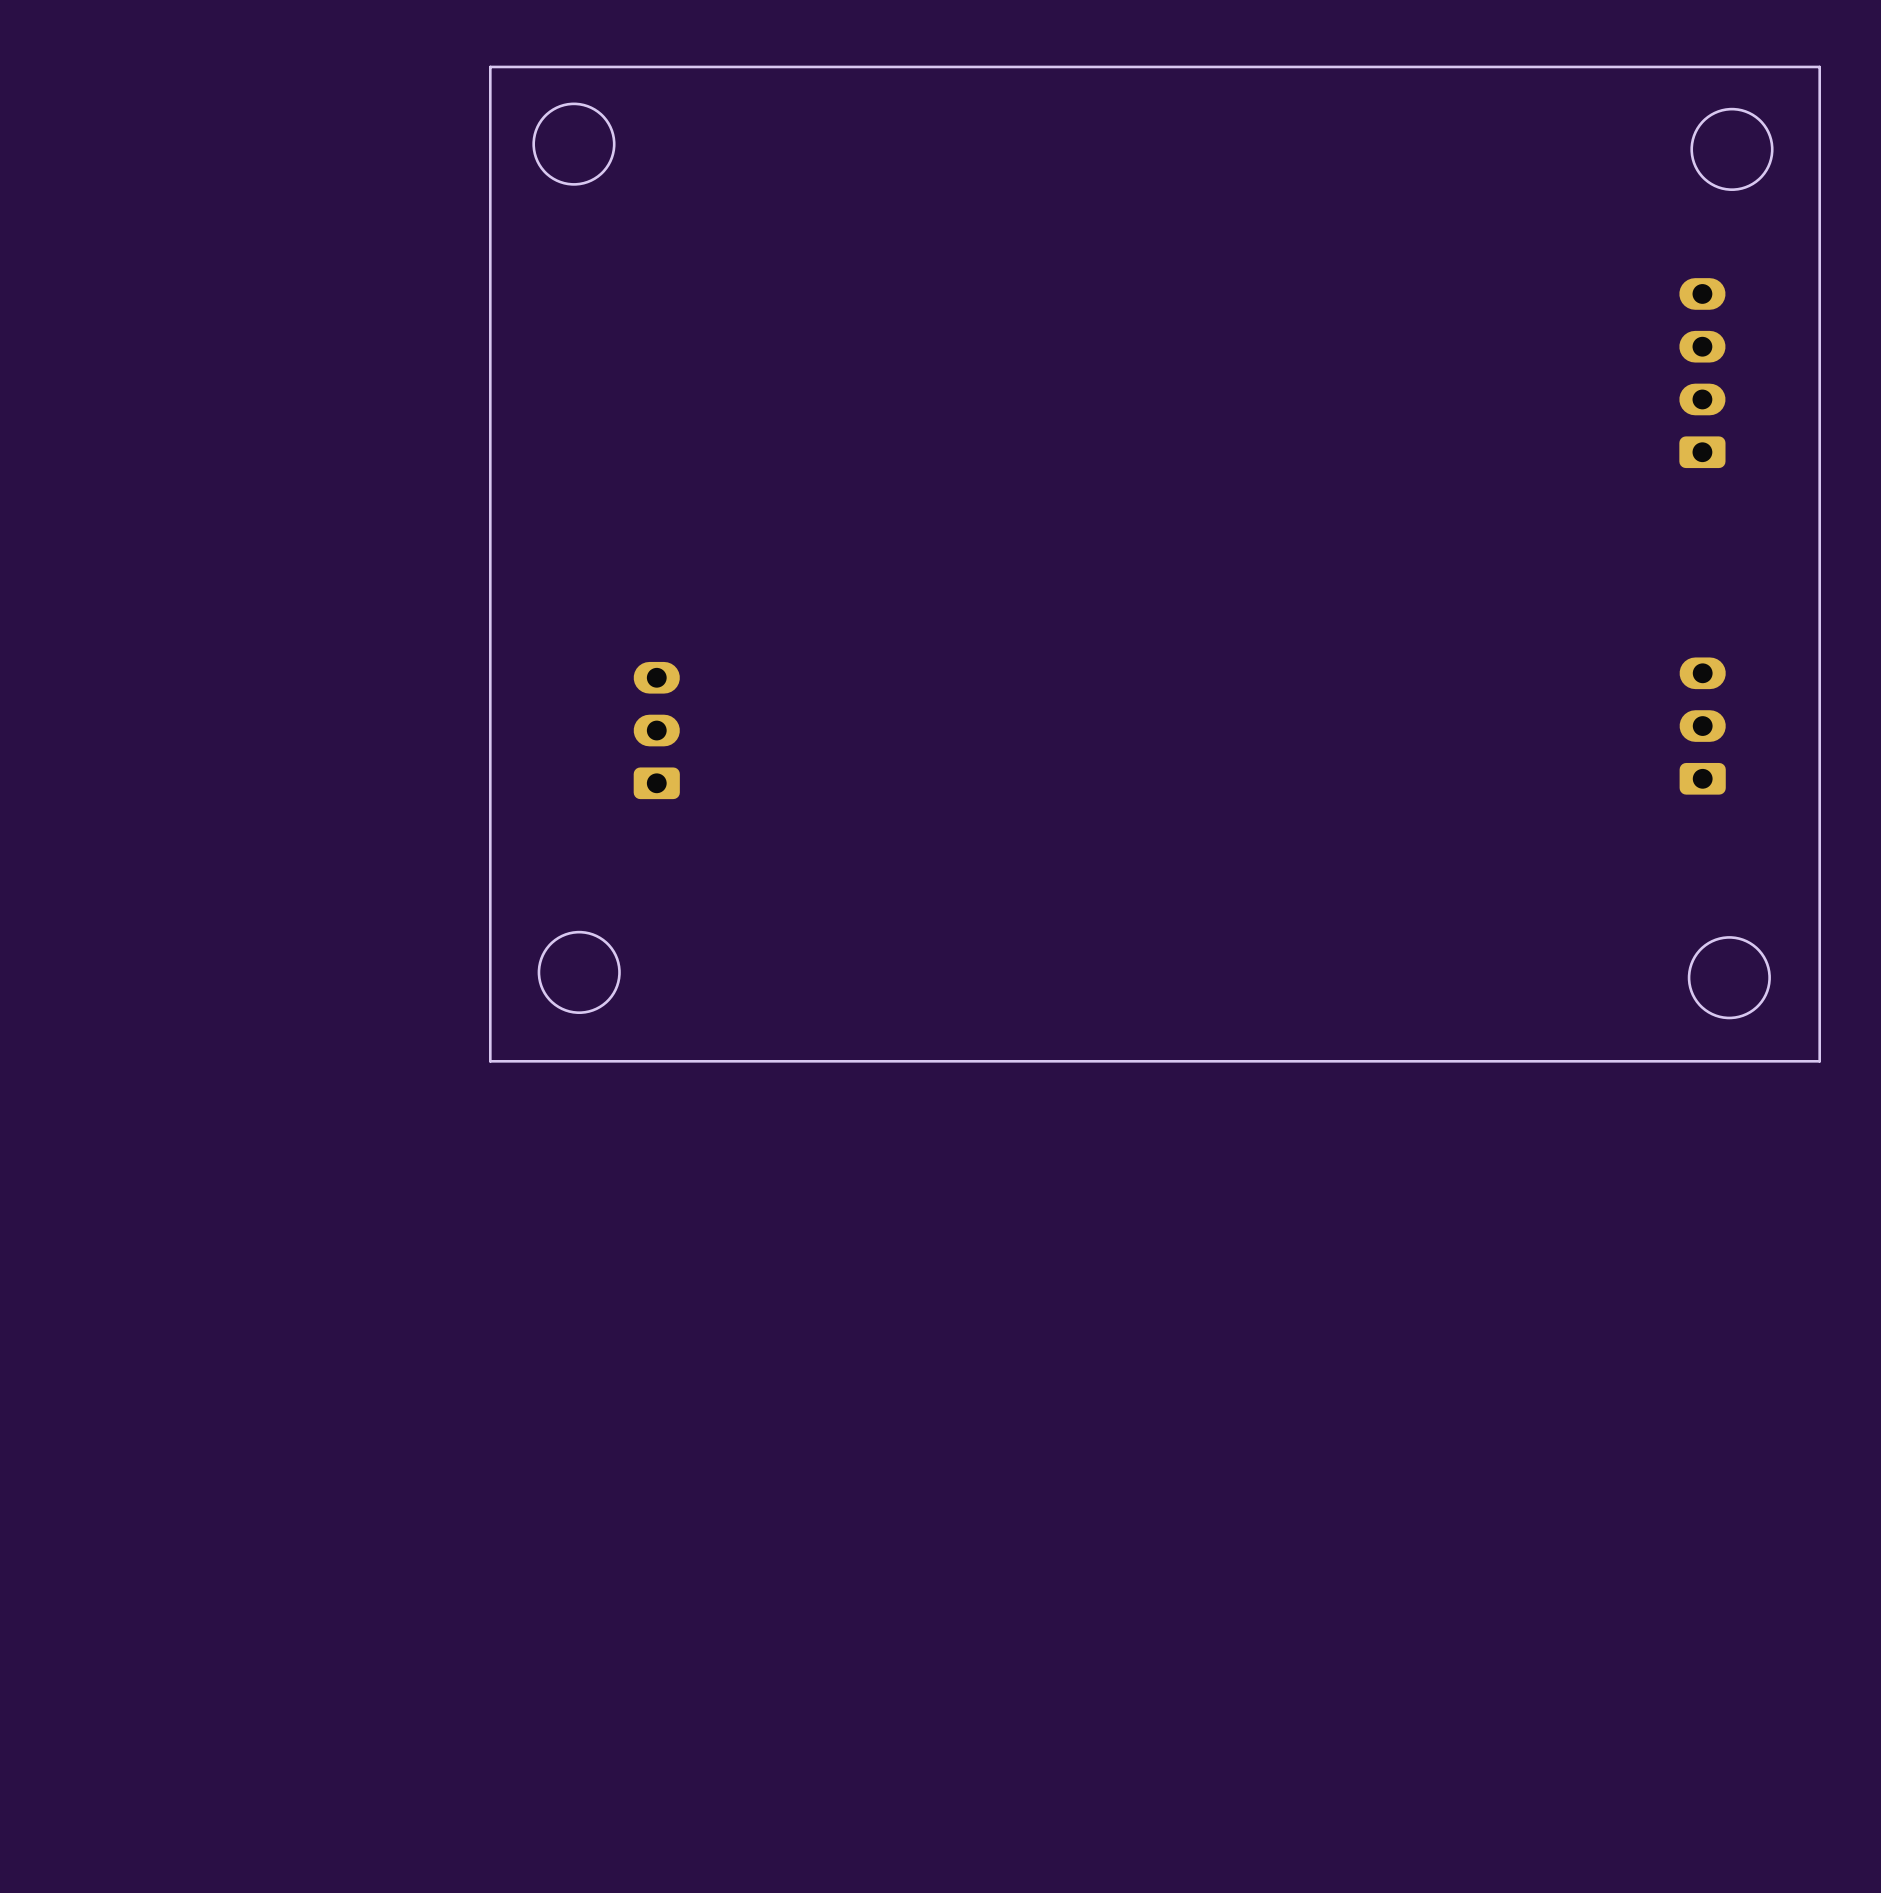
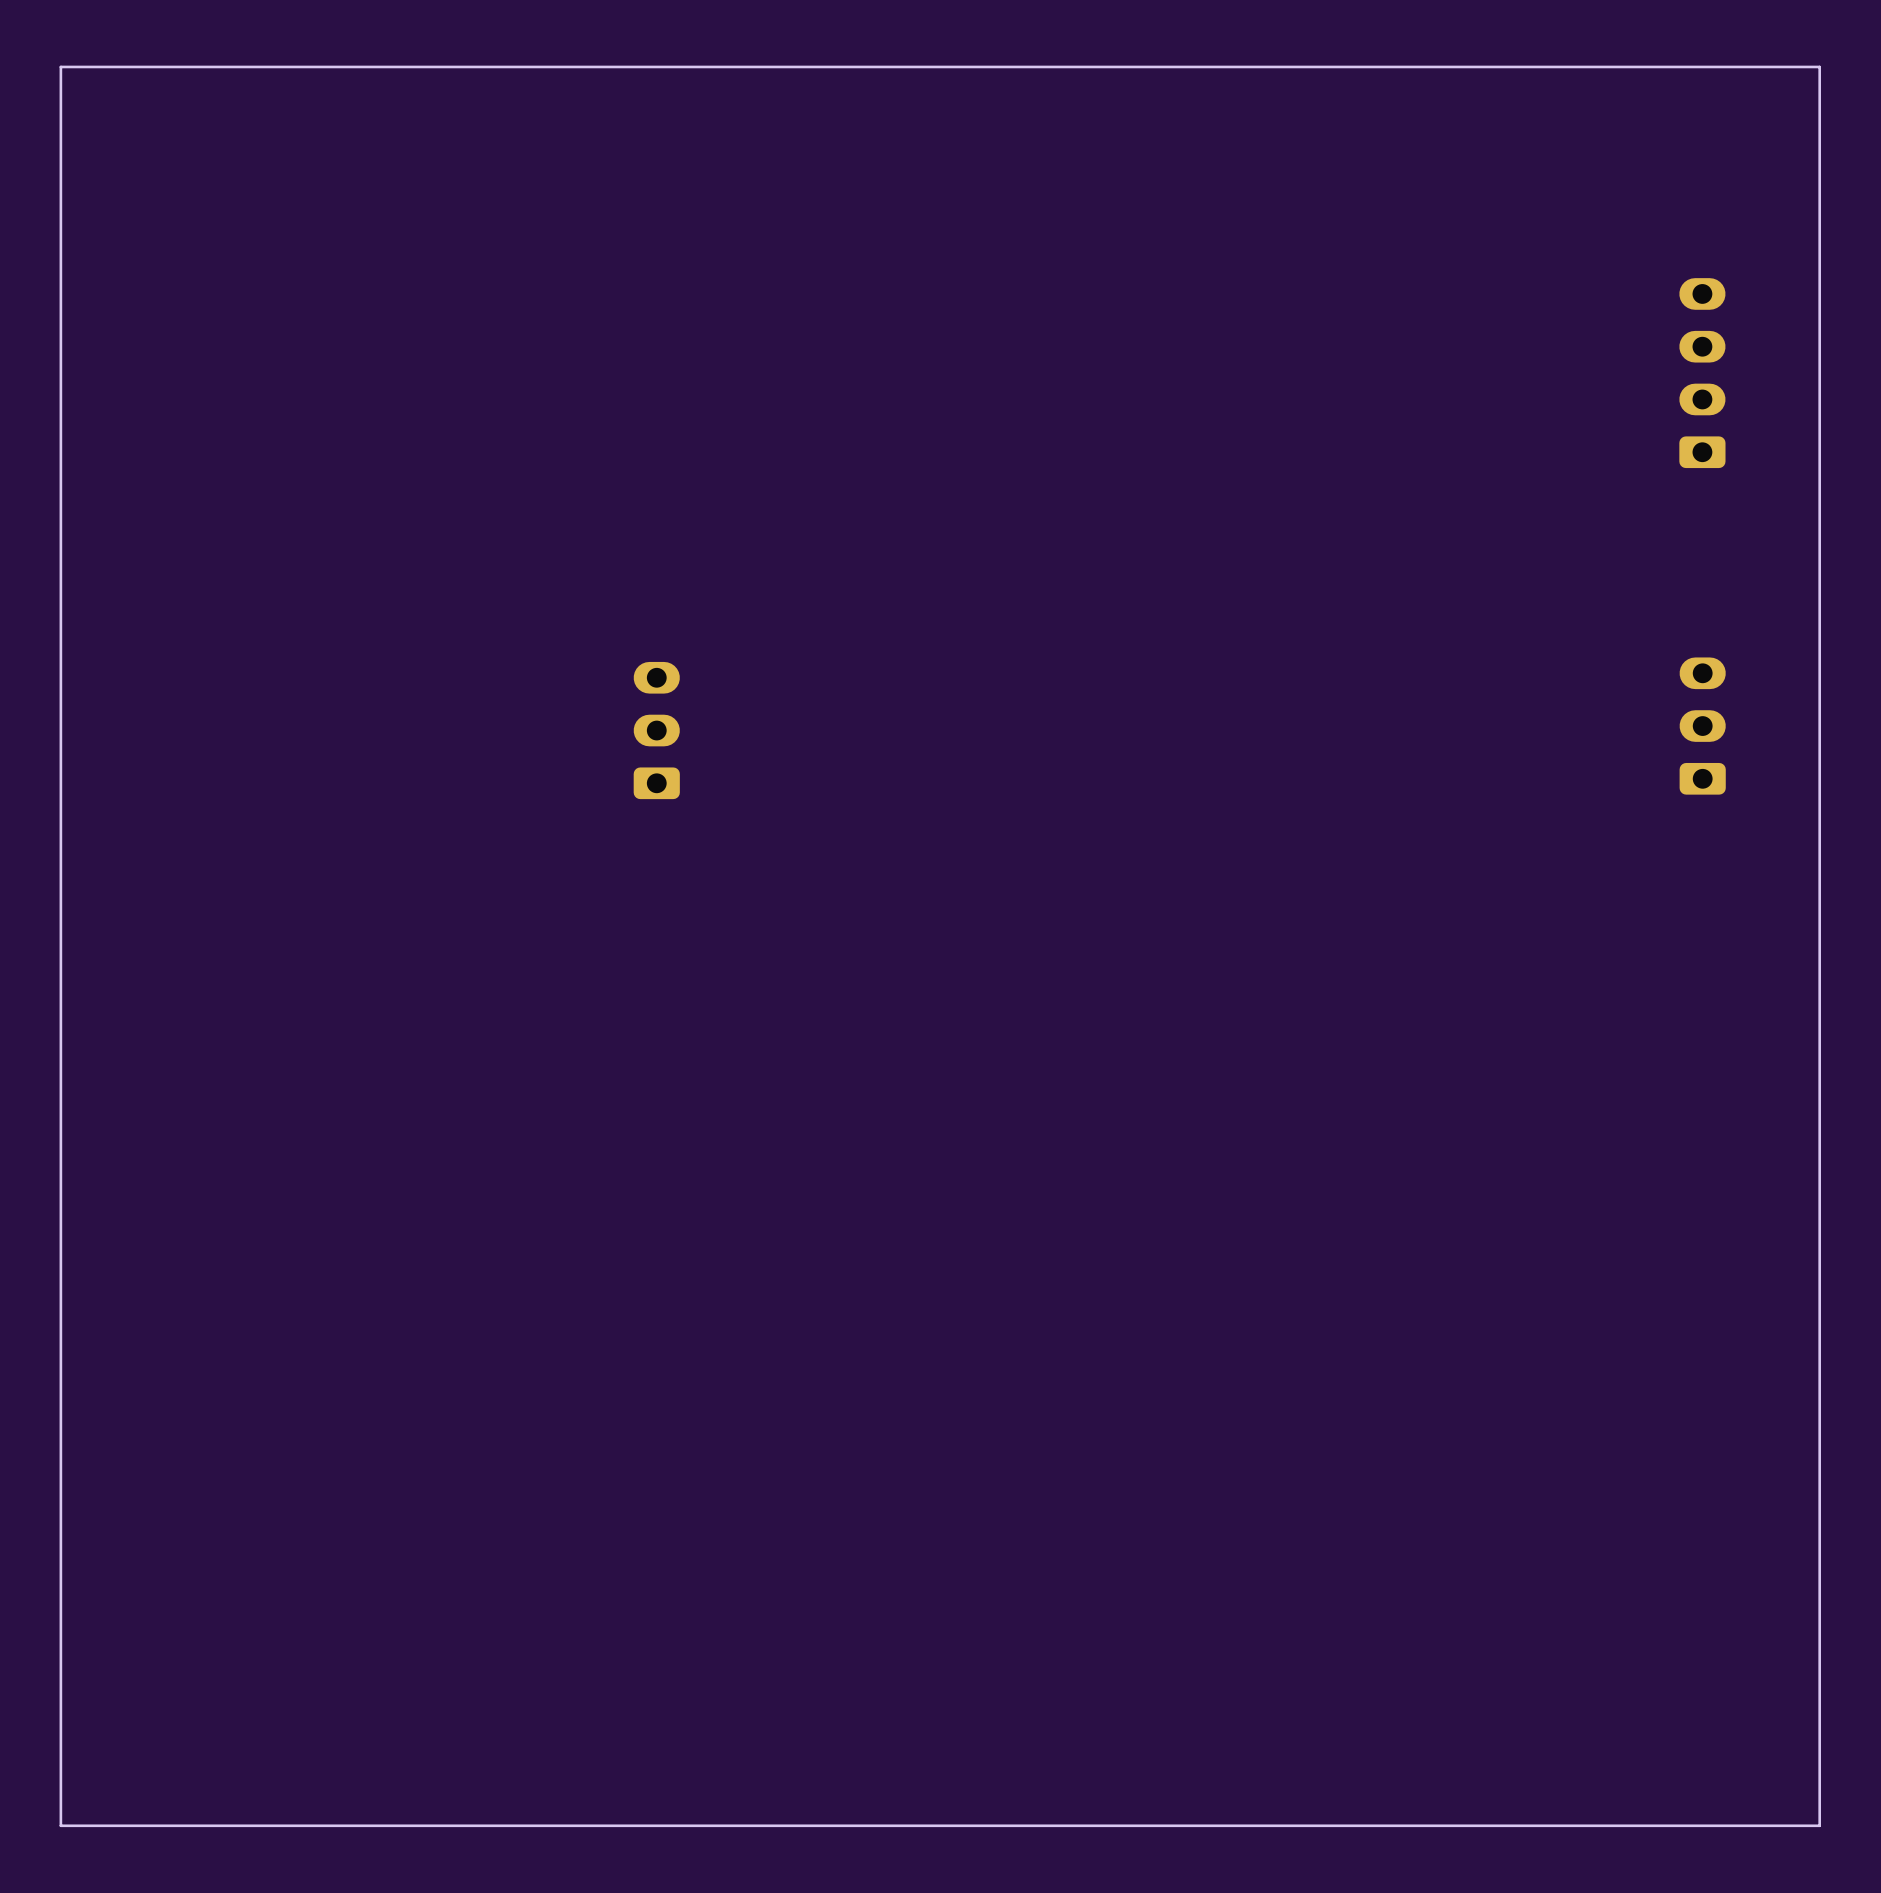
board edge: (490, 66) (490, 1061) (1819, 1061) -> (490, 66) (60, 66) (60, 1825) (1819, 1825) (1819, 1061)
round board edge: [532, 102, 616, 186] -> none
round board edge: [1690, 107, 1774, 191] -> none
round board edge: [537, 930, 621, 1015] -> none
round board edge: [1687, 936, 1771, 1020] -> none

